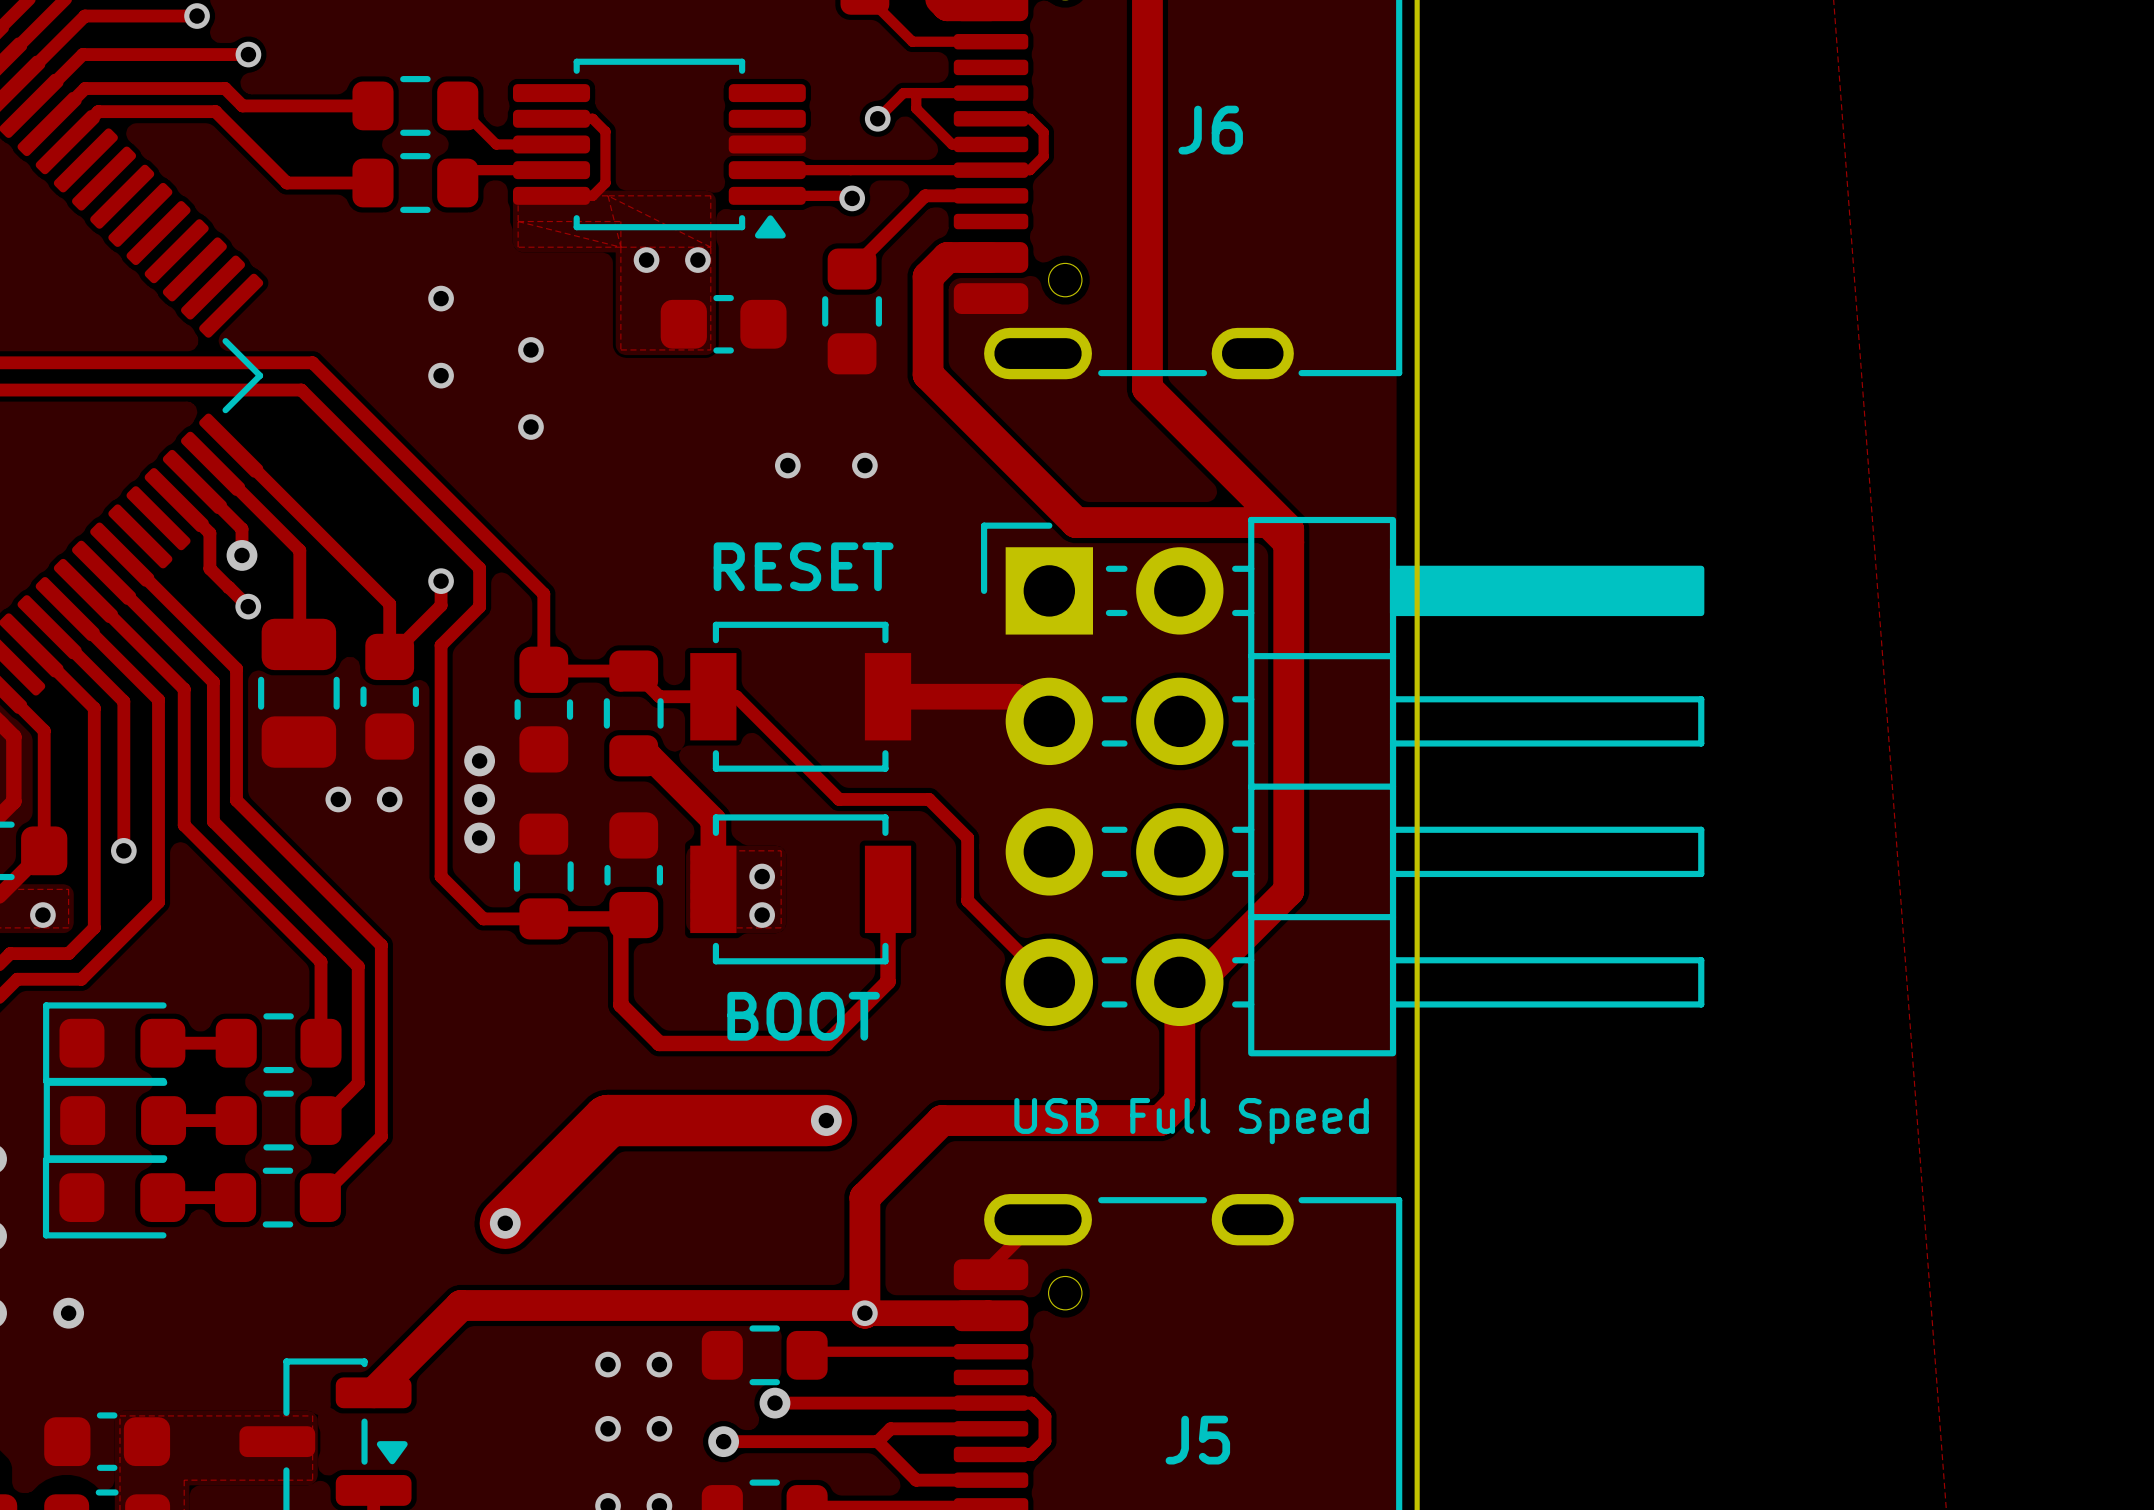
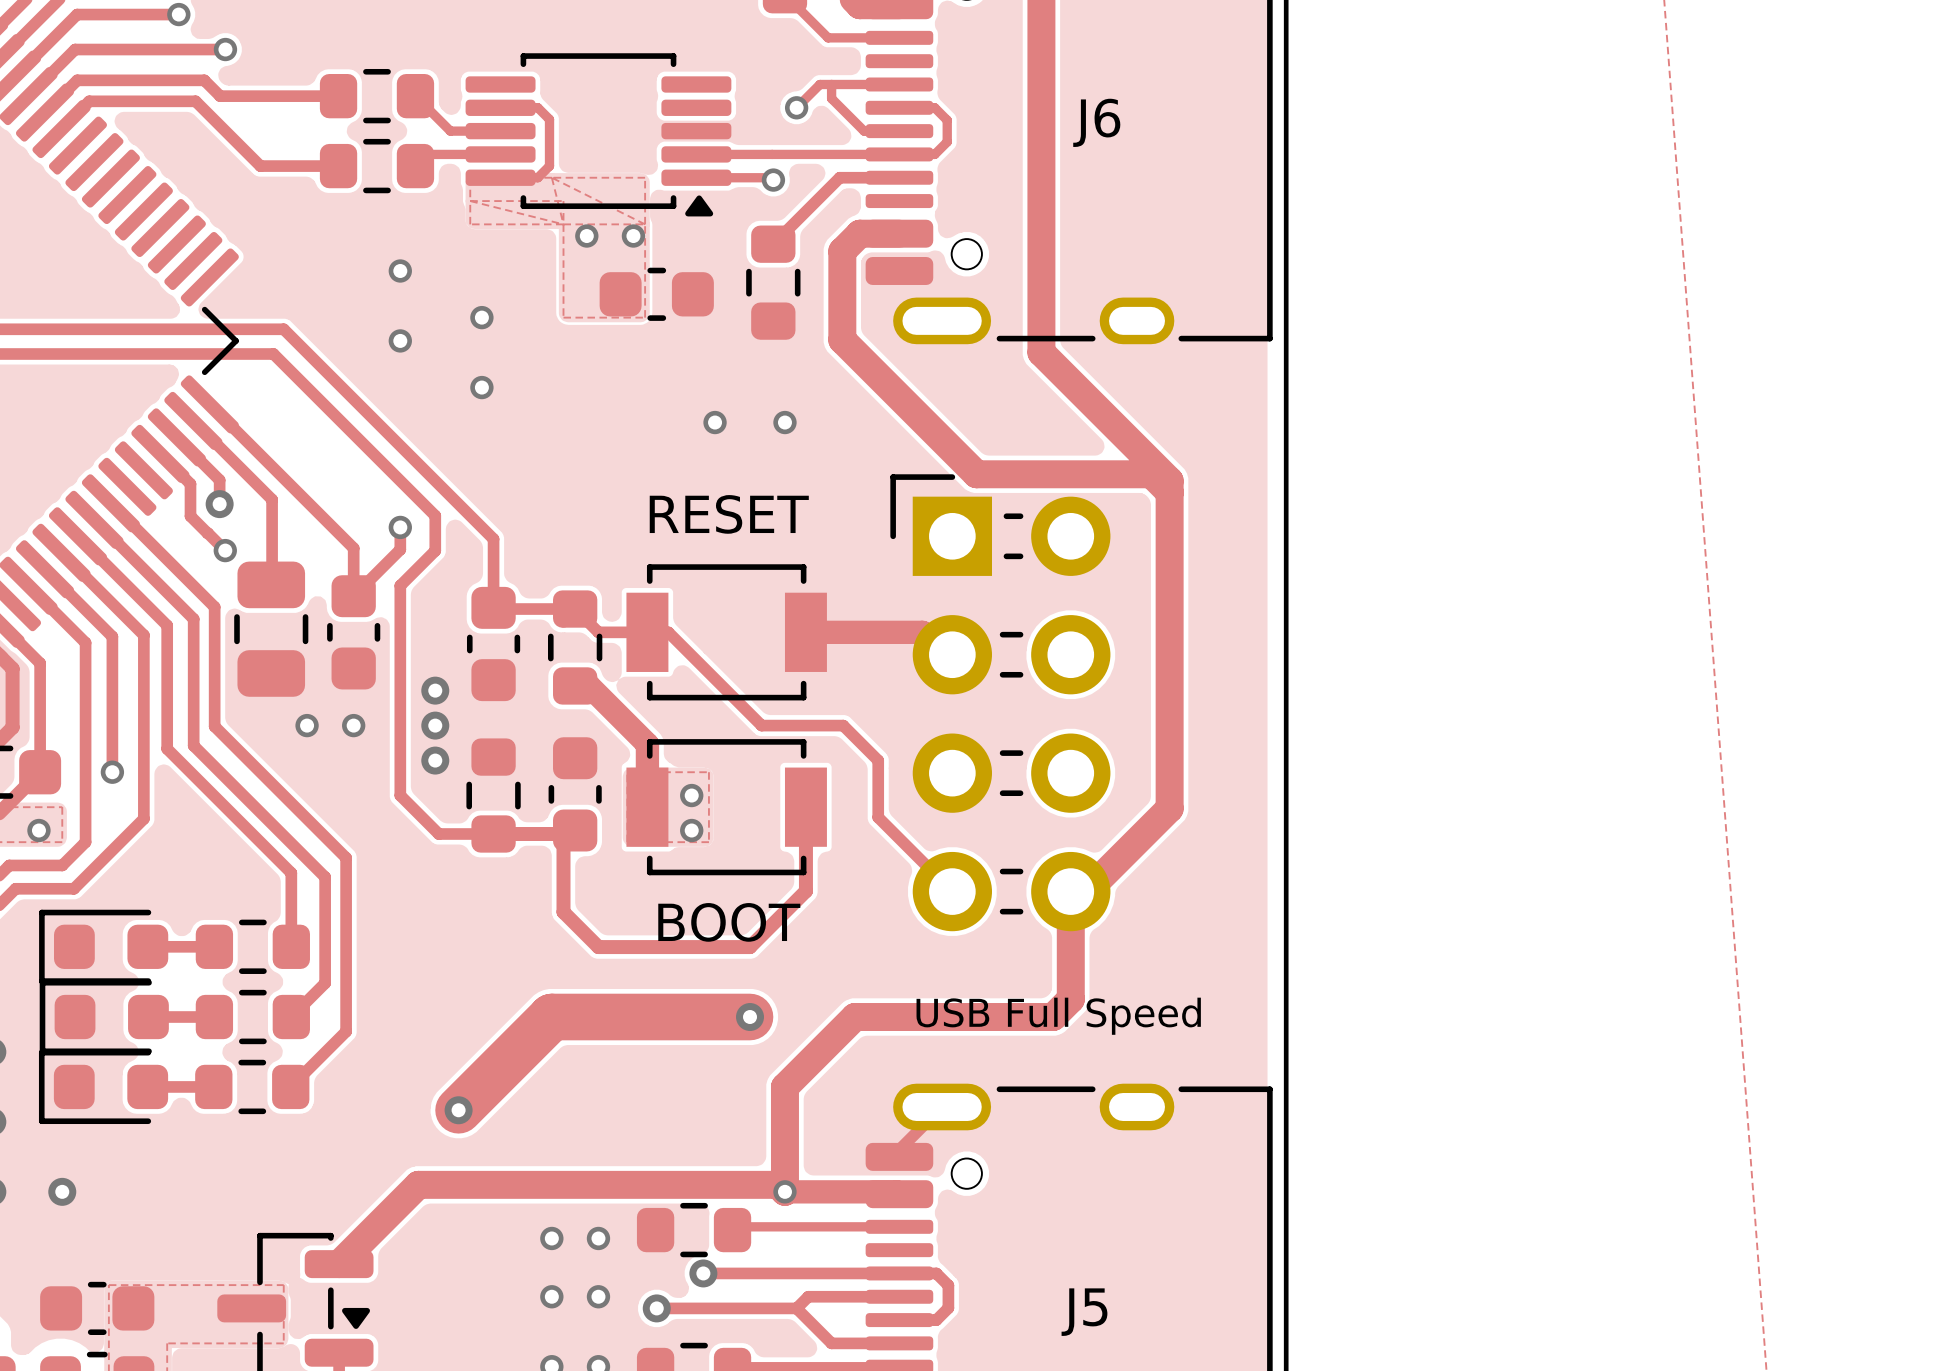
part: (1342, 786) -> none

